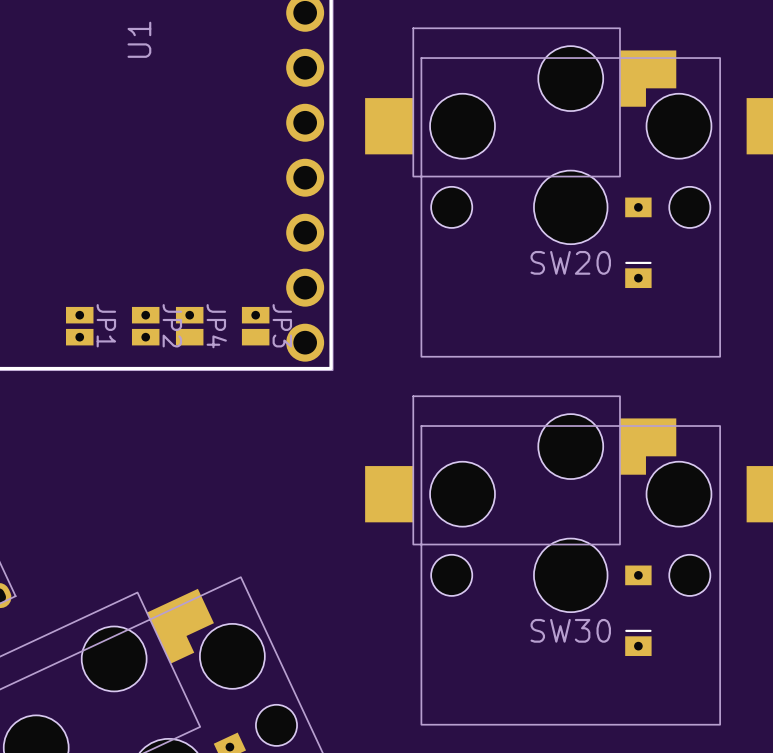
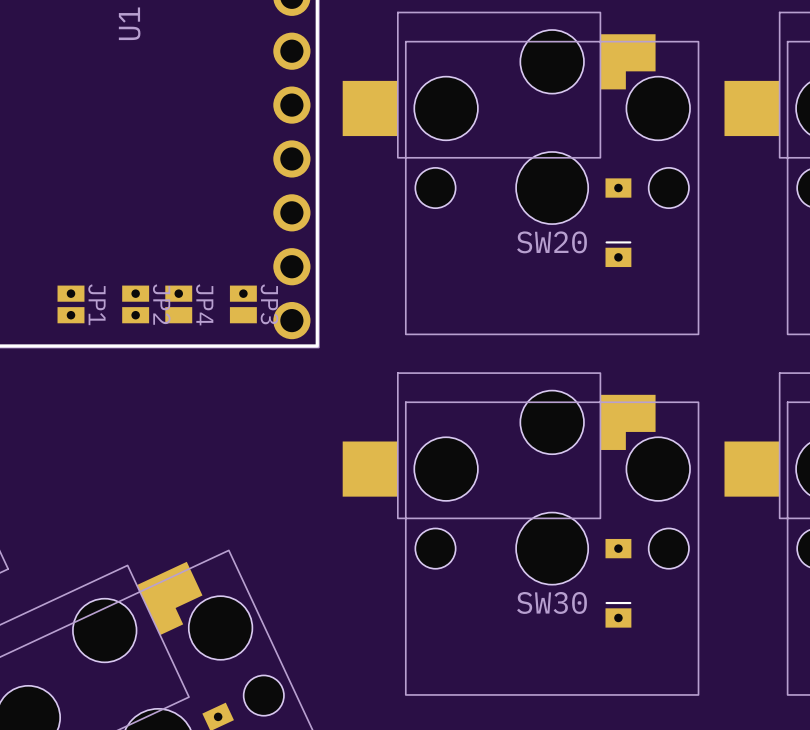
SW20 footprint: [365, 28, 721, 357] -> [342, 12, 699, 335]
SW30 footprint: [365, 396, 721, 725] -> [342, 373, 699, 695]

